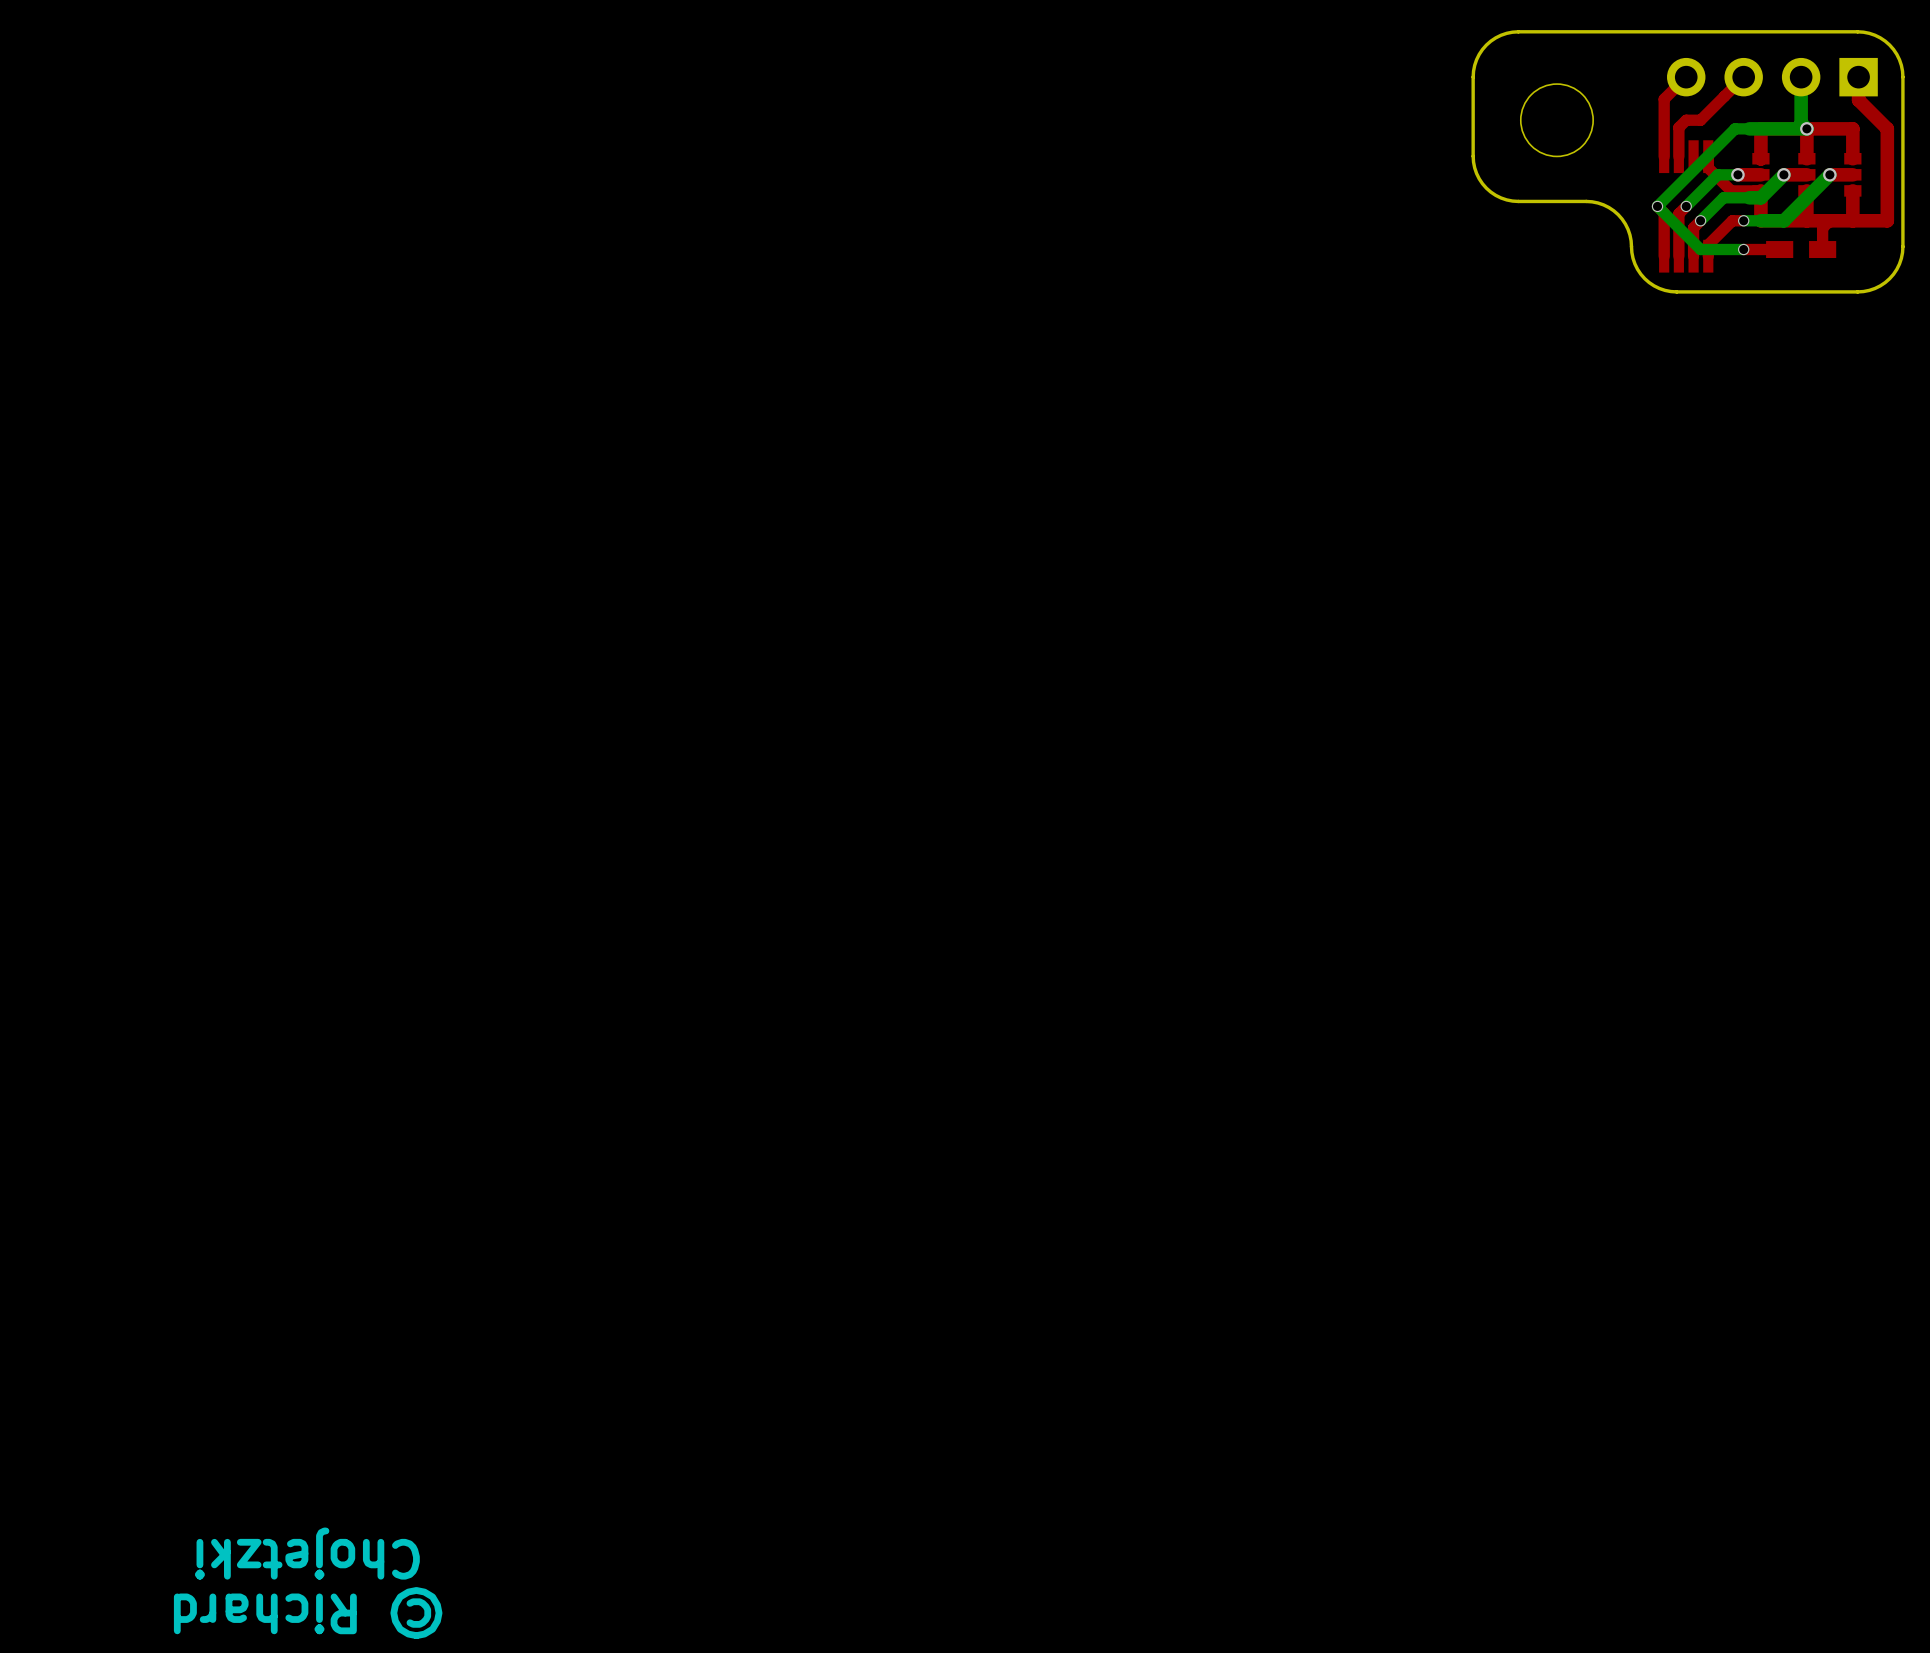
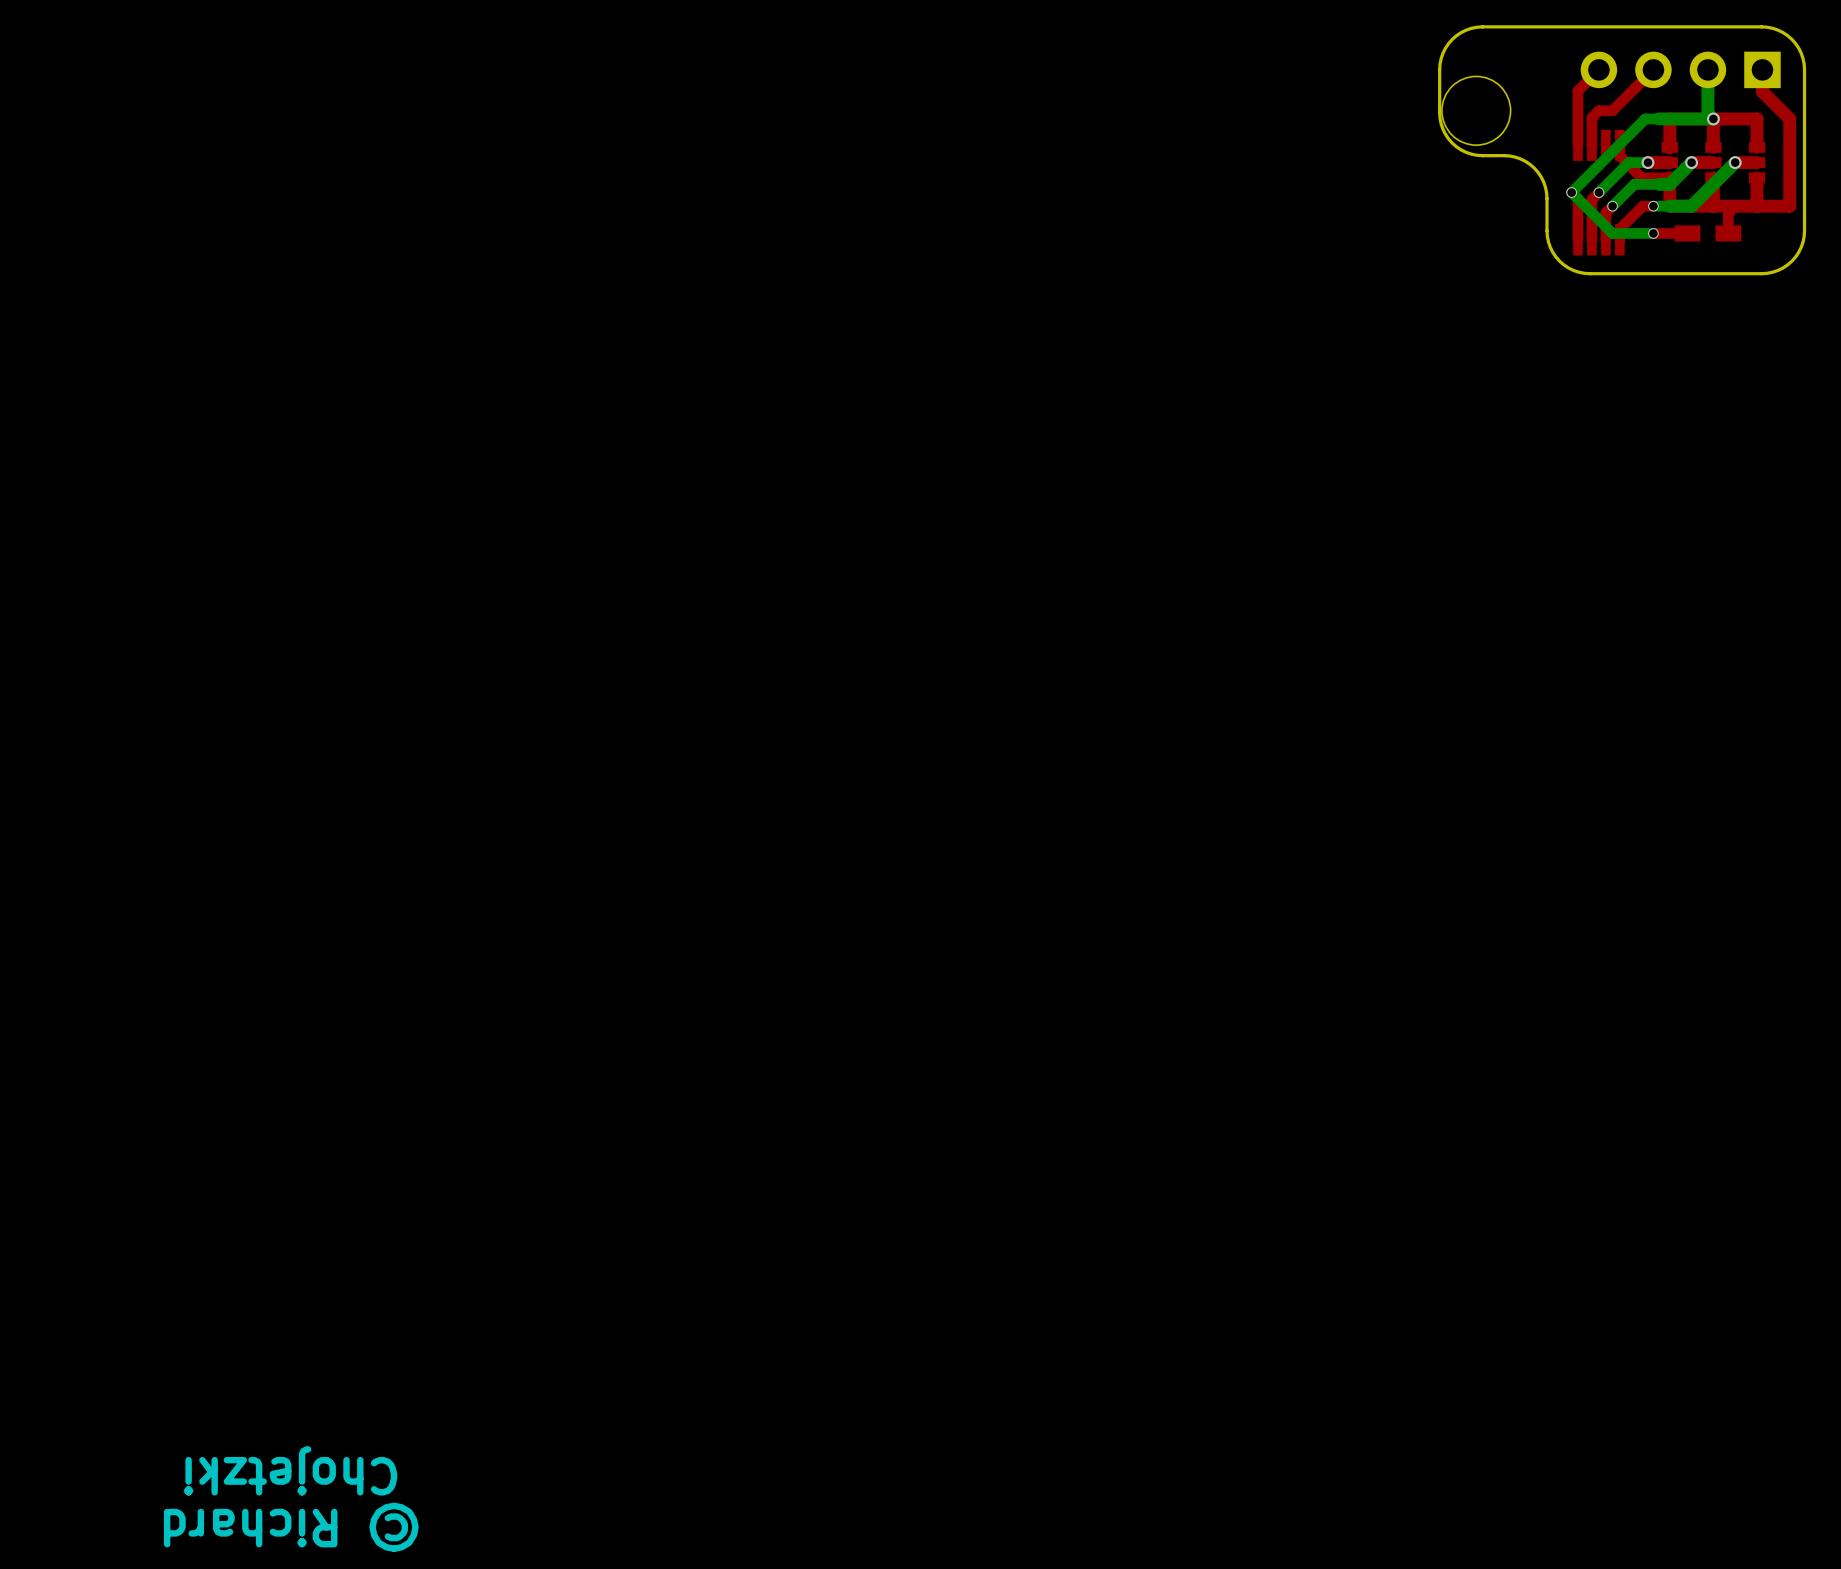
board edge: (1563, 31) (1506, 33) (1490, 41) (1479, 54) (1474, 65) (1473, 77) (1474, 167) (1479, 178) (1486, 188) (1495, 195) (1506, 199) (1592, 201) (1608, 207) (1618, 214) (1625, 224) (1629, 234) (1631, 246) -> (1482, 26) (1471, 28) (1456, 35) (1442, 53) (1439, 69) (1441, 123) (1448, 138) (1466, 152) (1476, 155) (1515, 157) (1534, 168) (1545, 187) (1546, 230)

